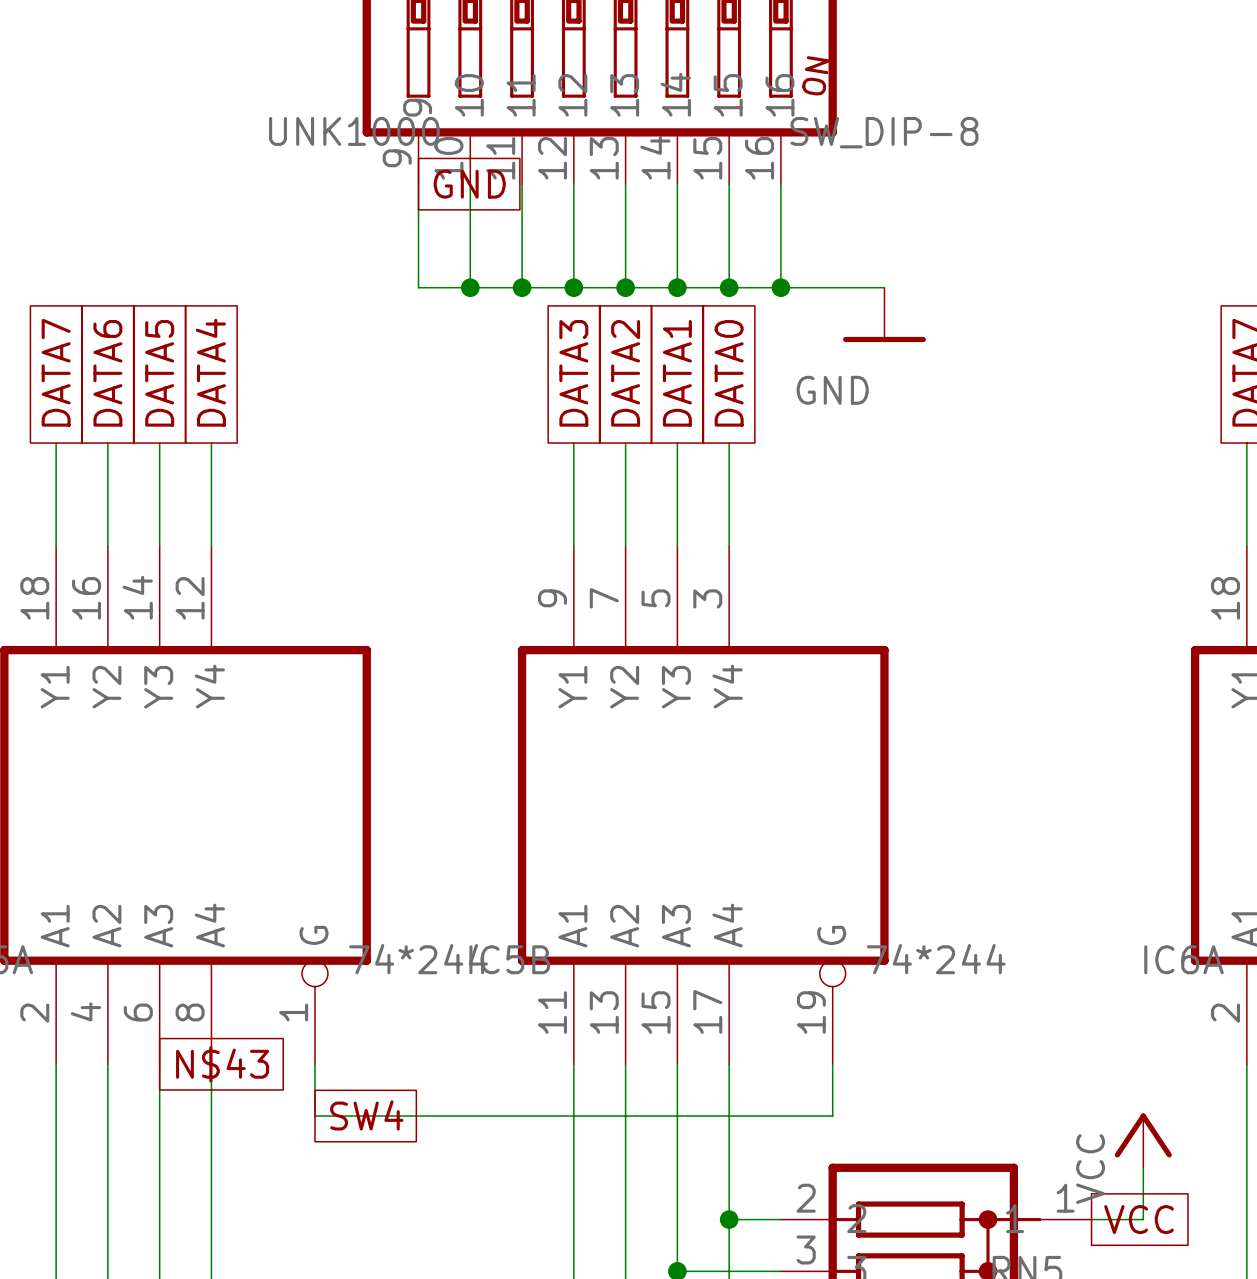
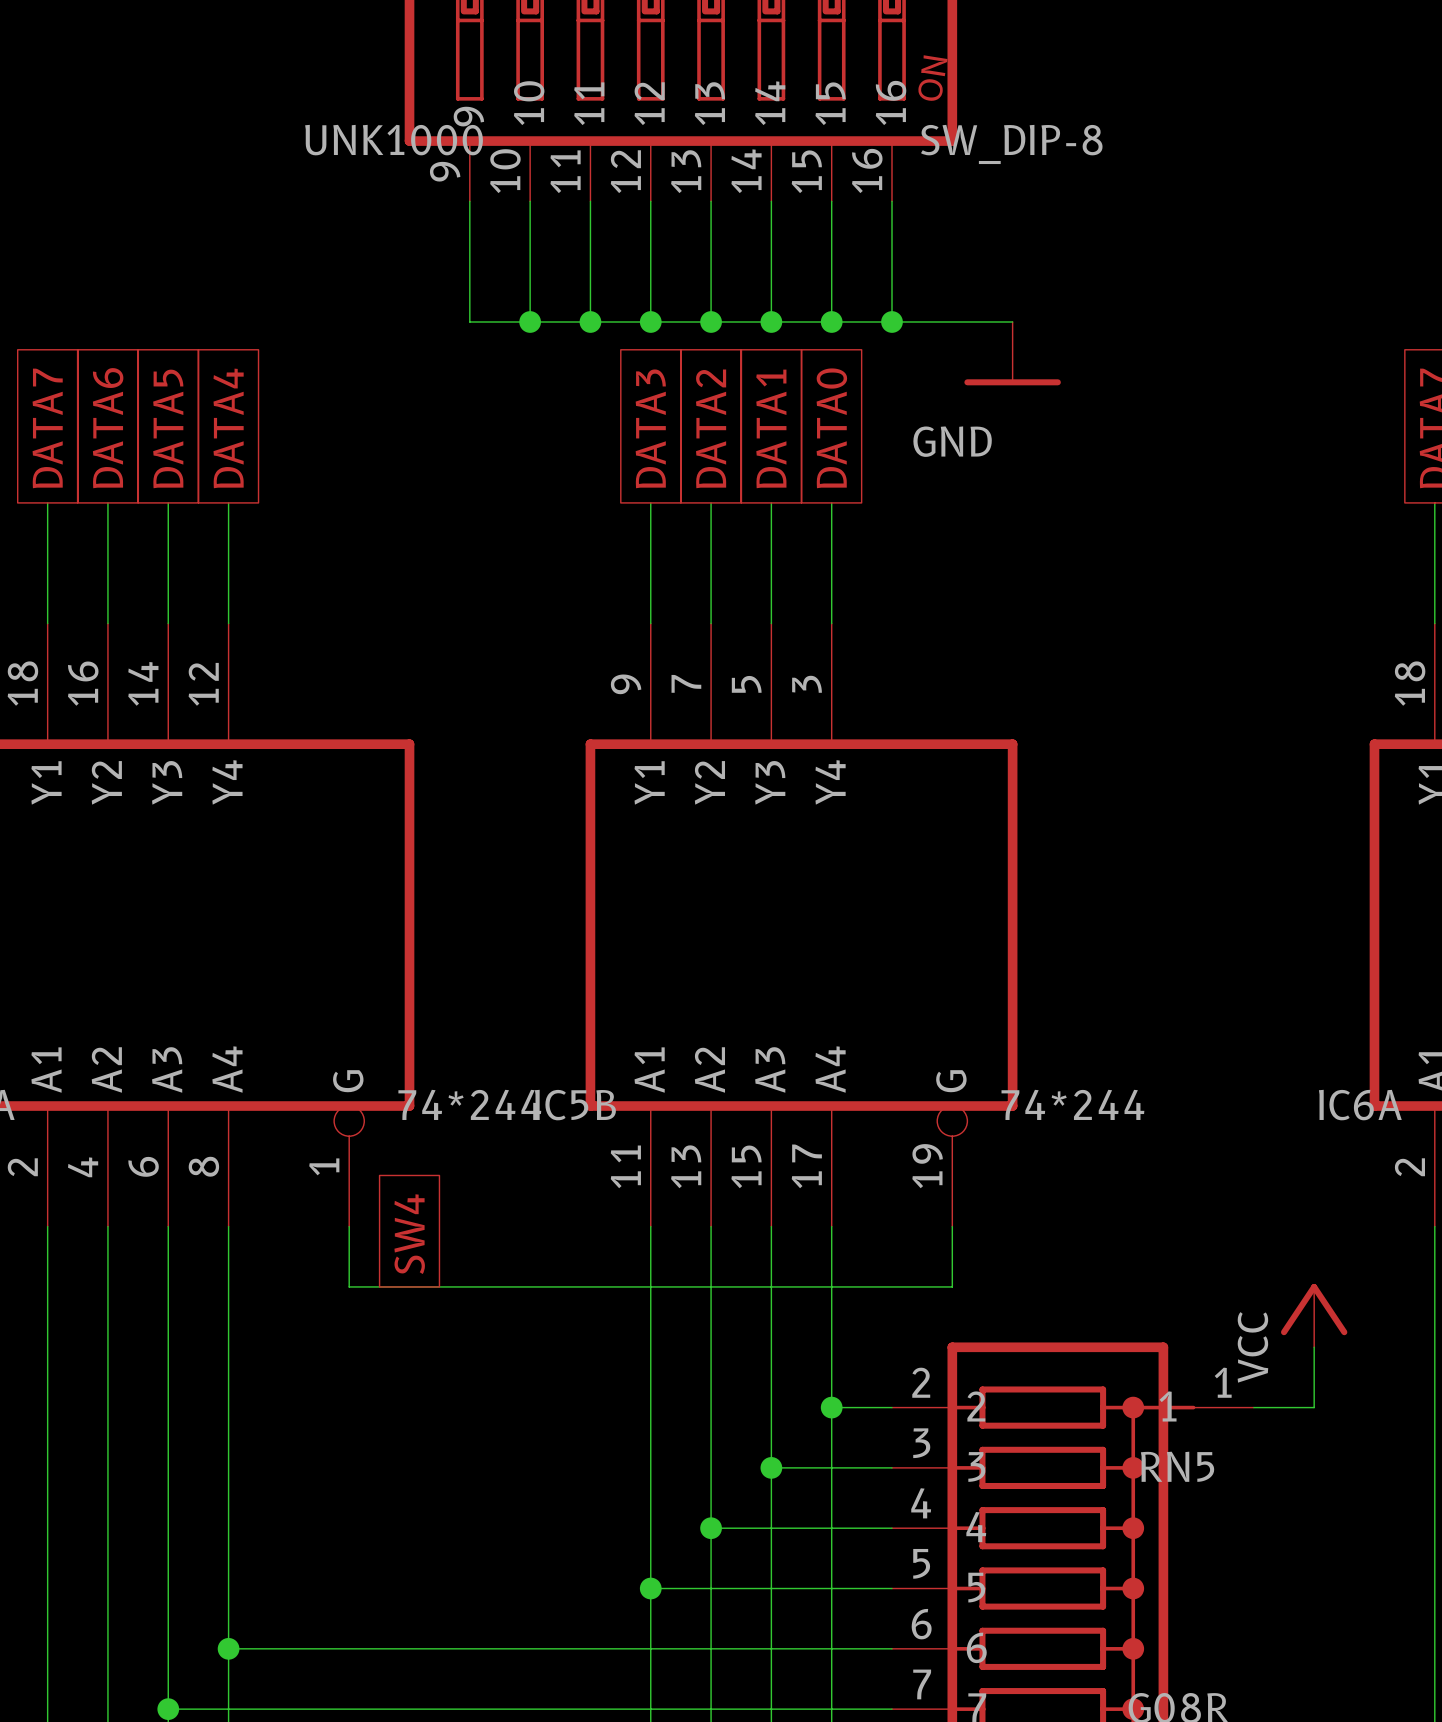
global label: GND (469, 184) -> none
global label: N$43 (222, 1064) -> none
global label rotation: 0° (366, 1115) -> 90° counterclockwise (409, 1234)
global label: VCC (1139, 1219) -> none

